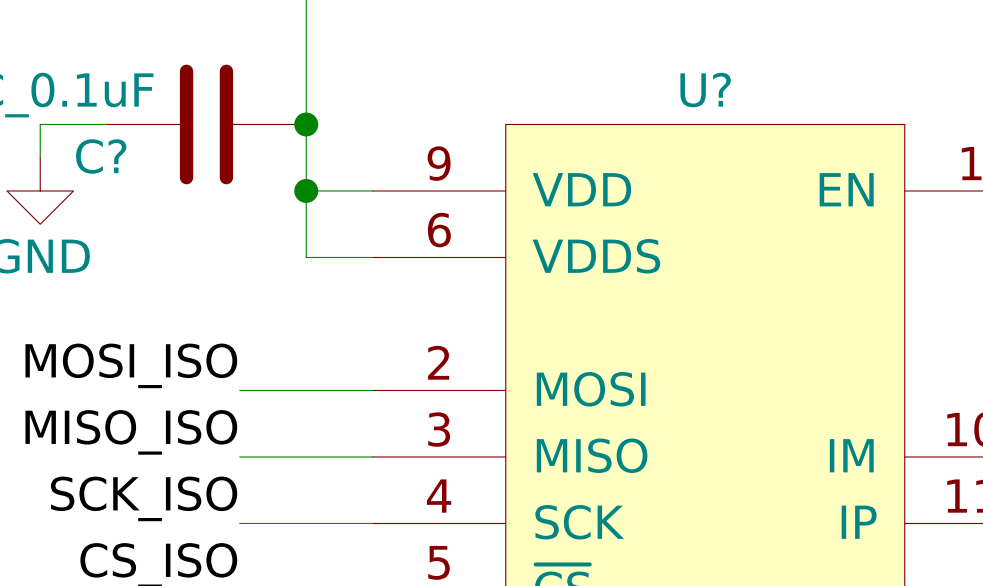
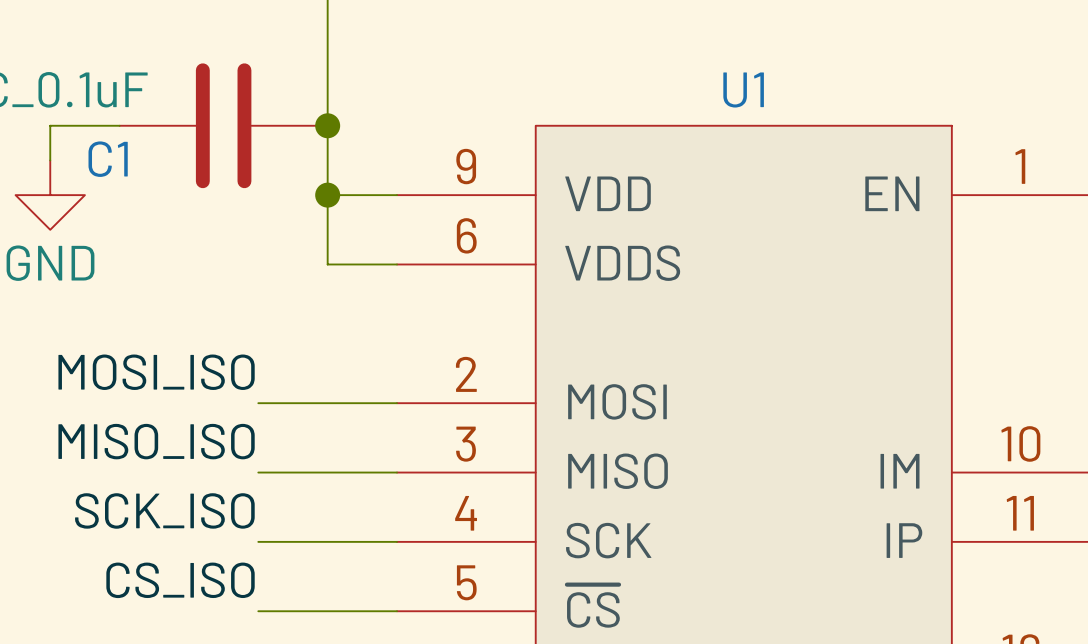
U? name: U? (705, 90) -> U1 (743, 89)
C? name: C? (101, 156) -> C1 (108, 159)

